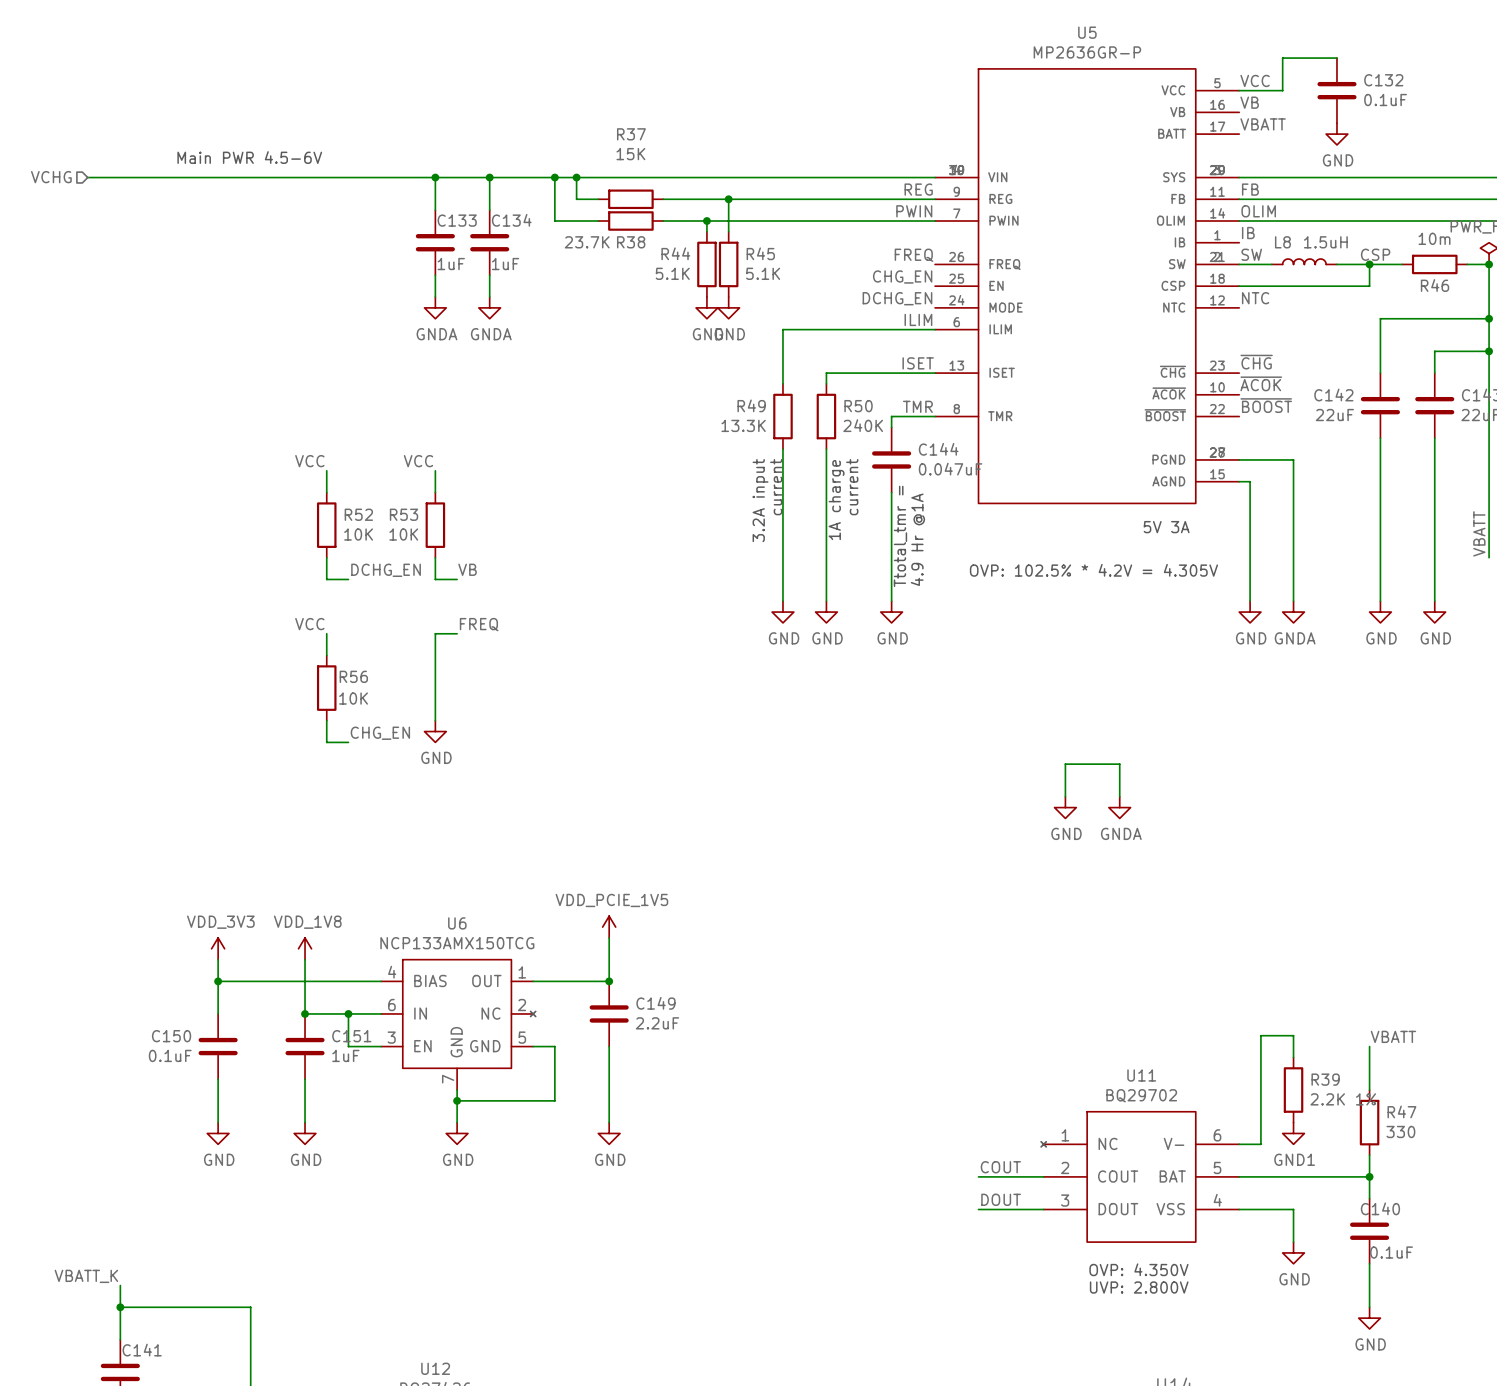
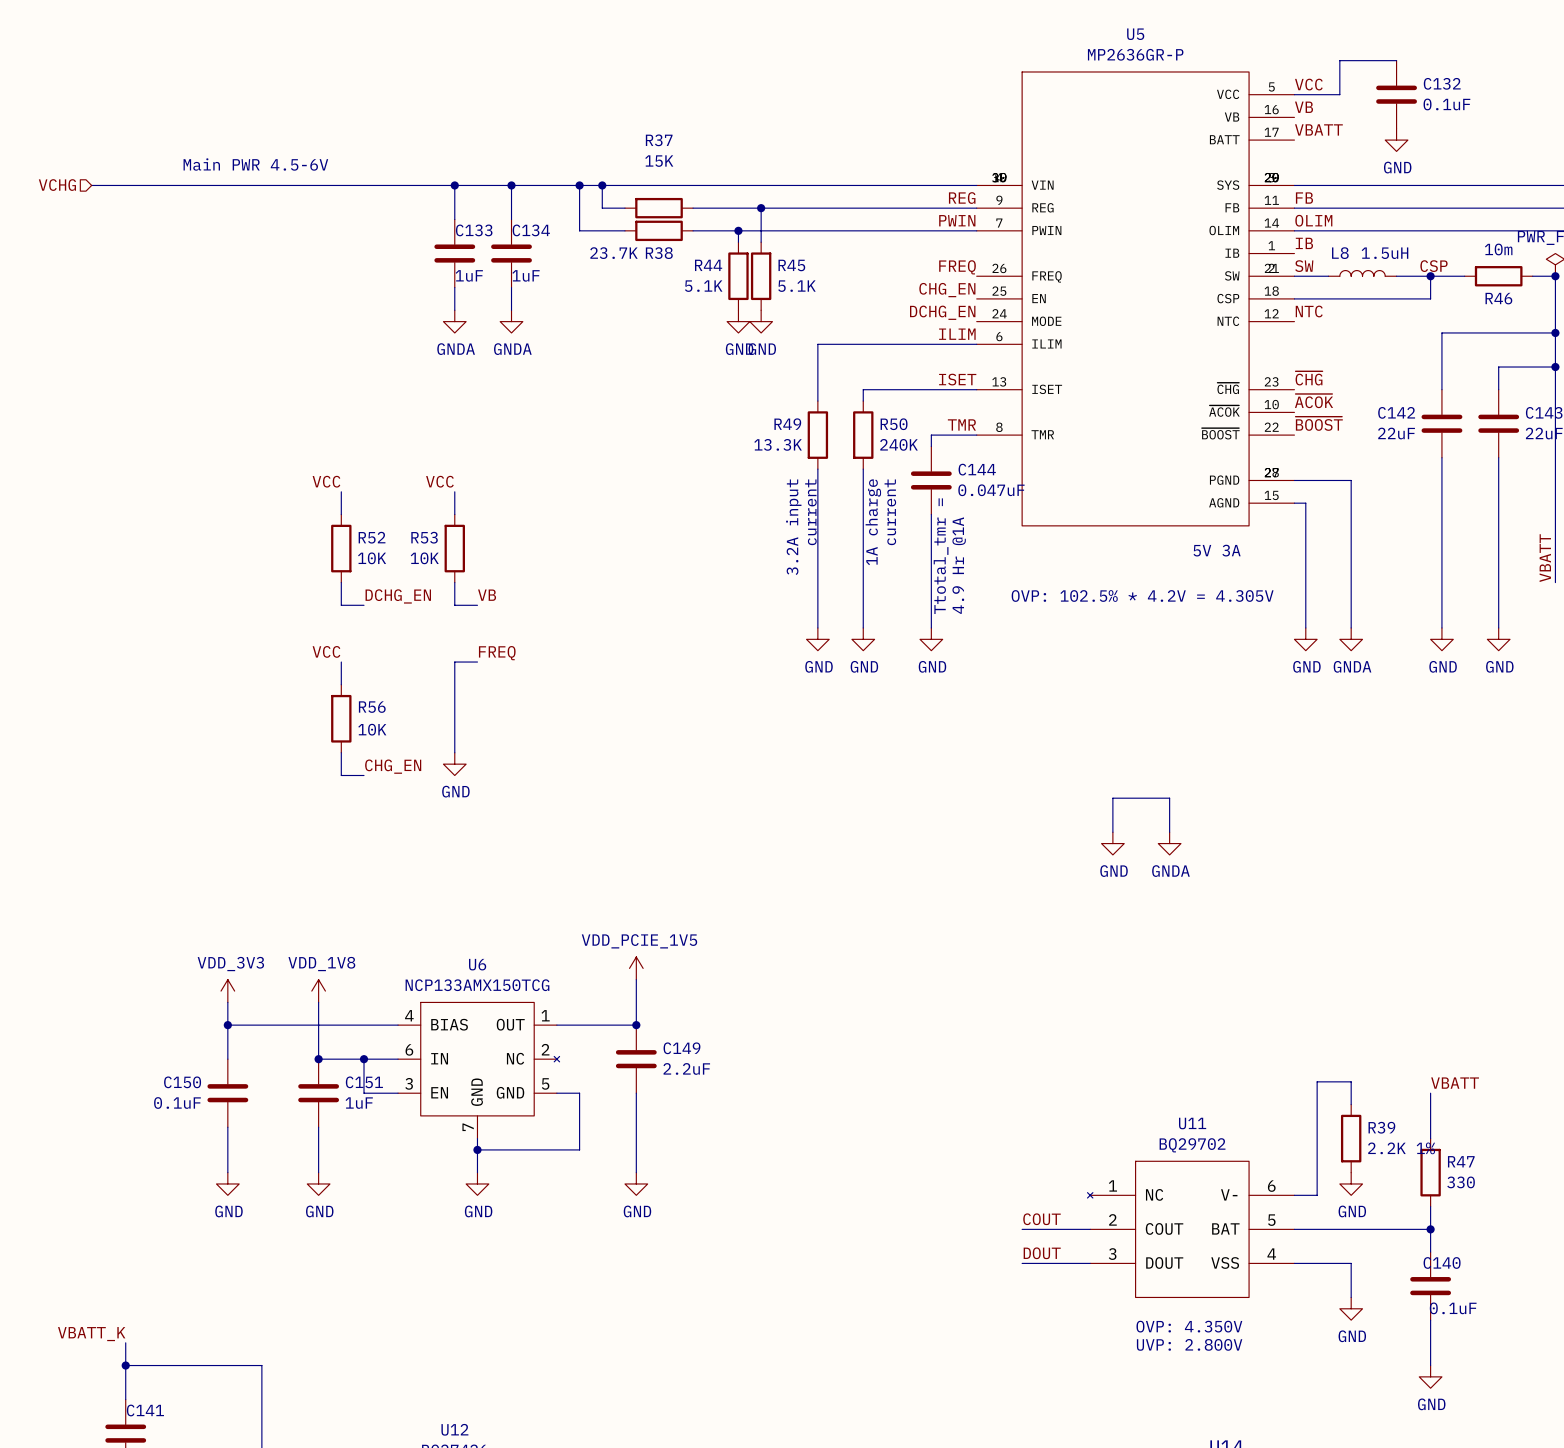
power symbol: GND1 (1293, 1133) -> GND (1351, 1183)

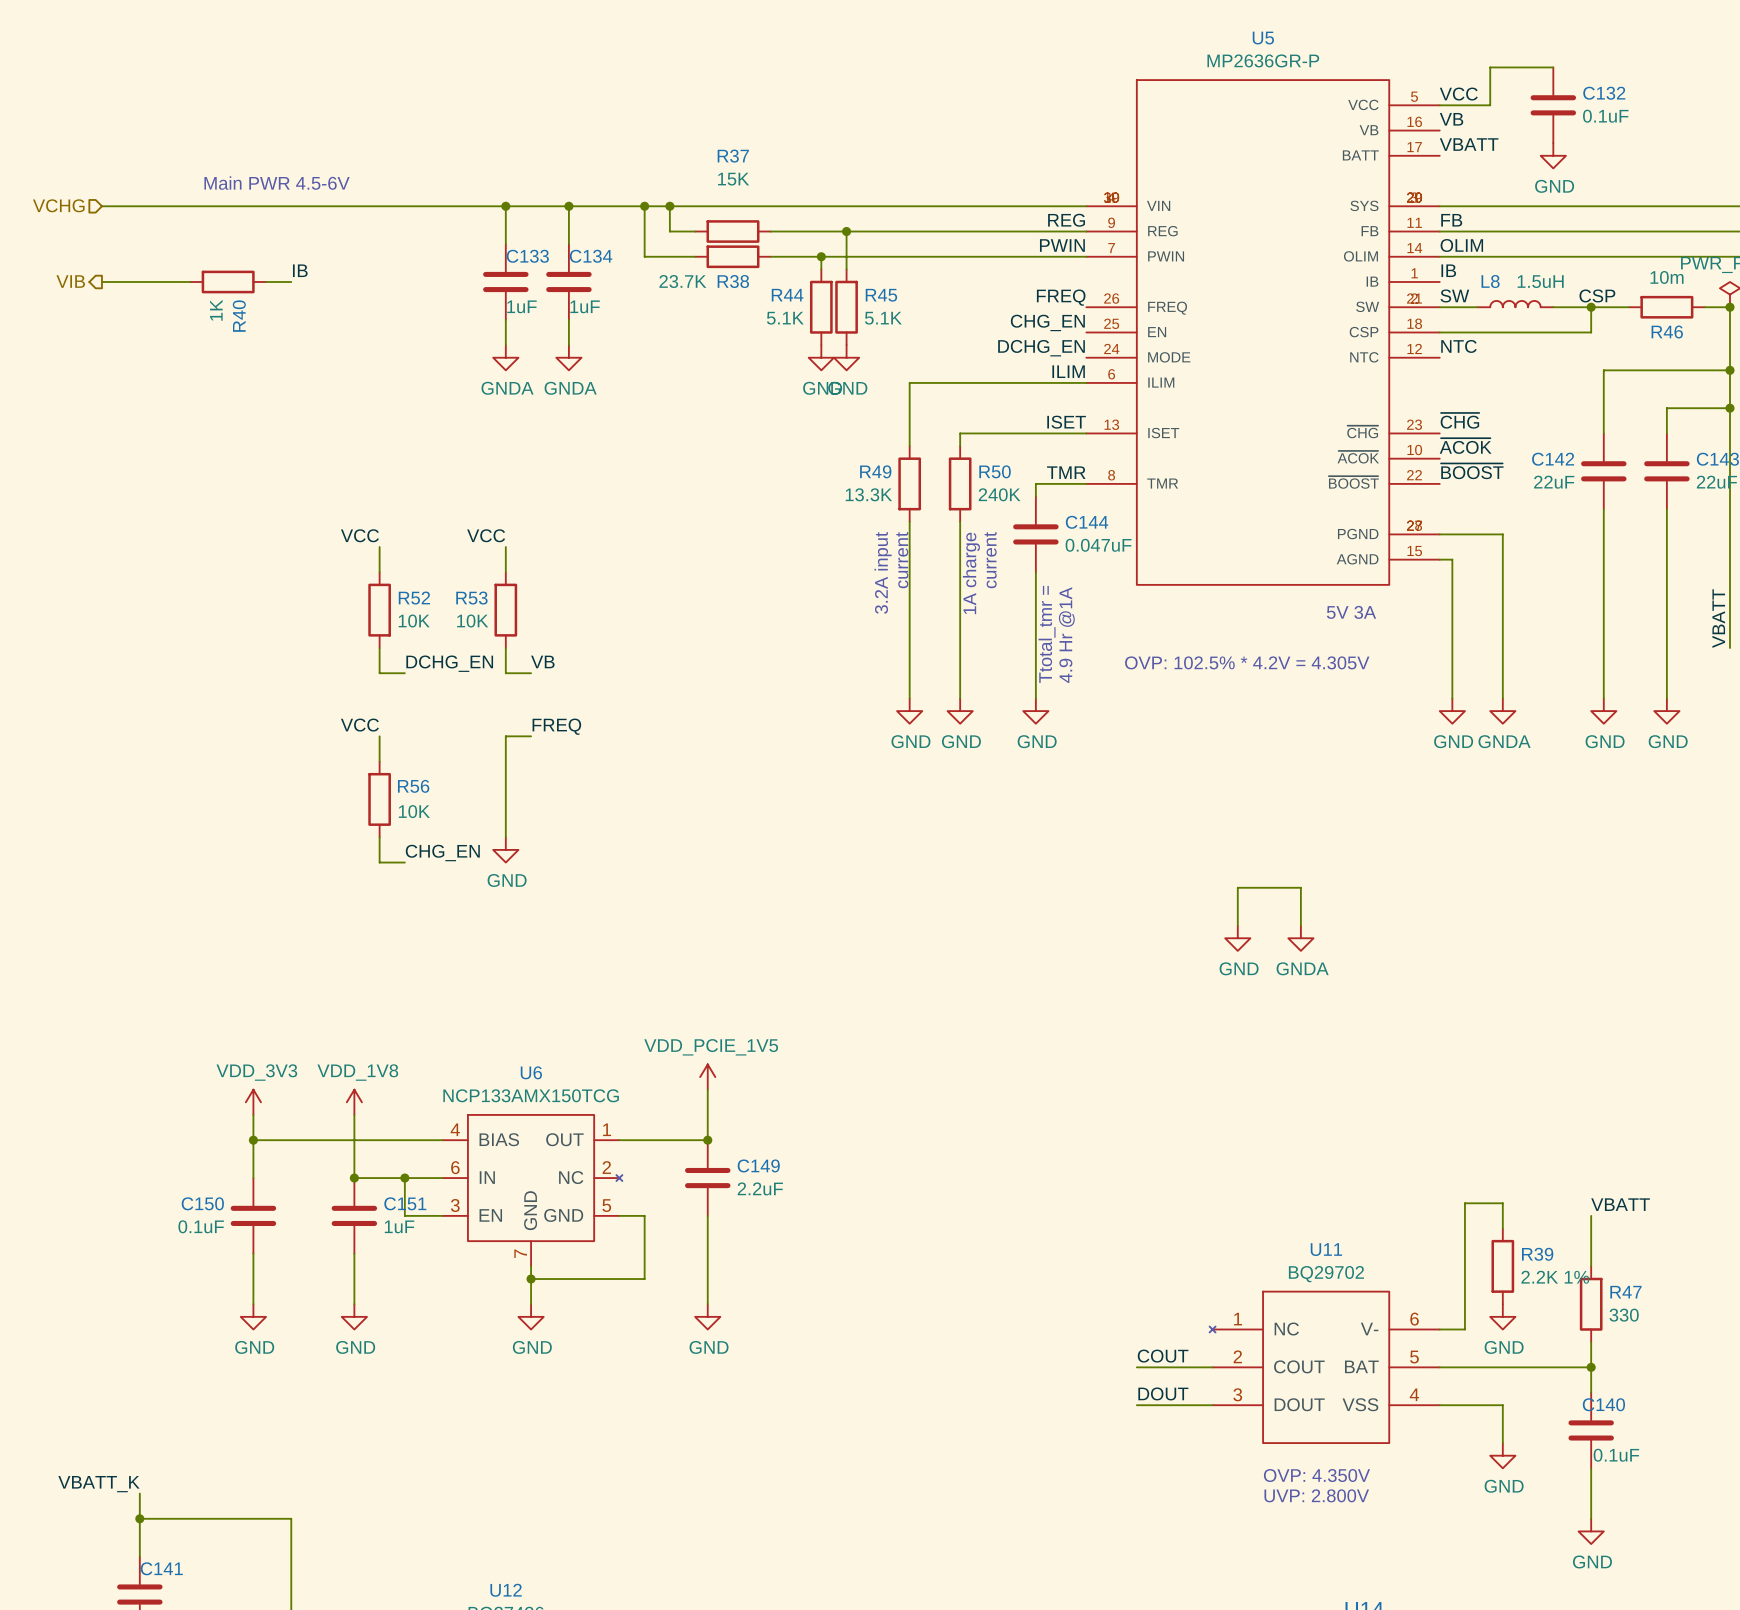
label: none -> IB (300, 270)
hierarchical label: none -> VIB (70, 281)
wire: none -> (101, 282) (190, 282)
R40: none -> 1K (228, 282)
wire: none -> (266, 282) (291, 282)

